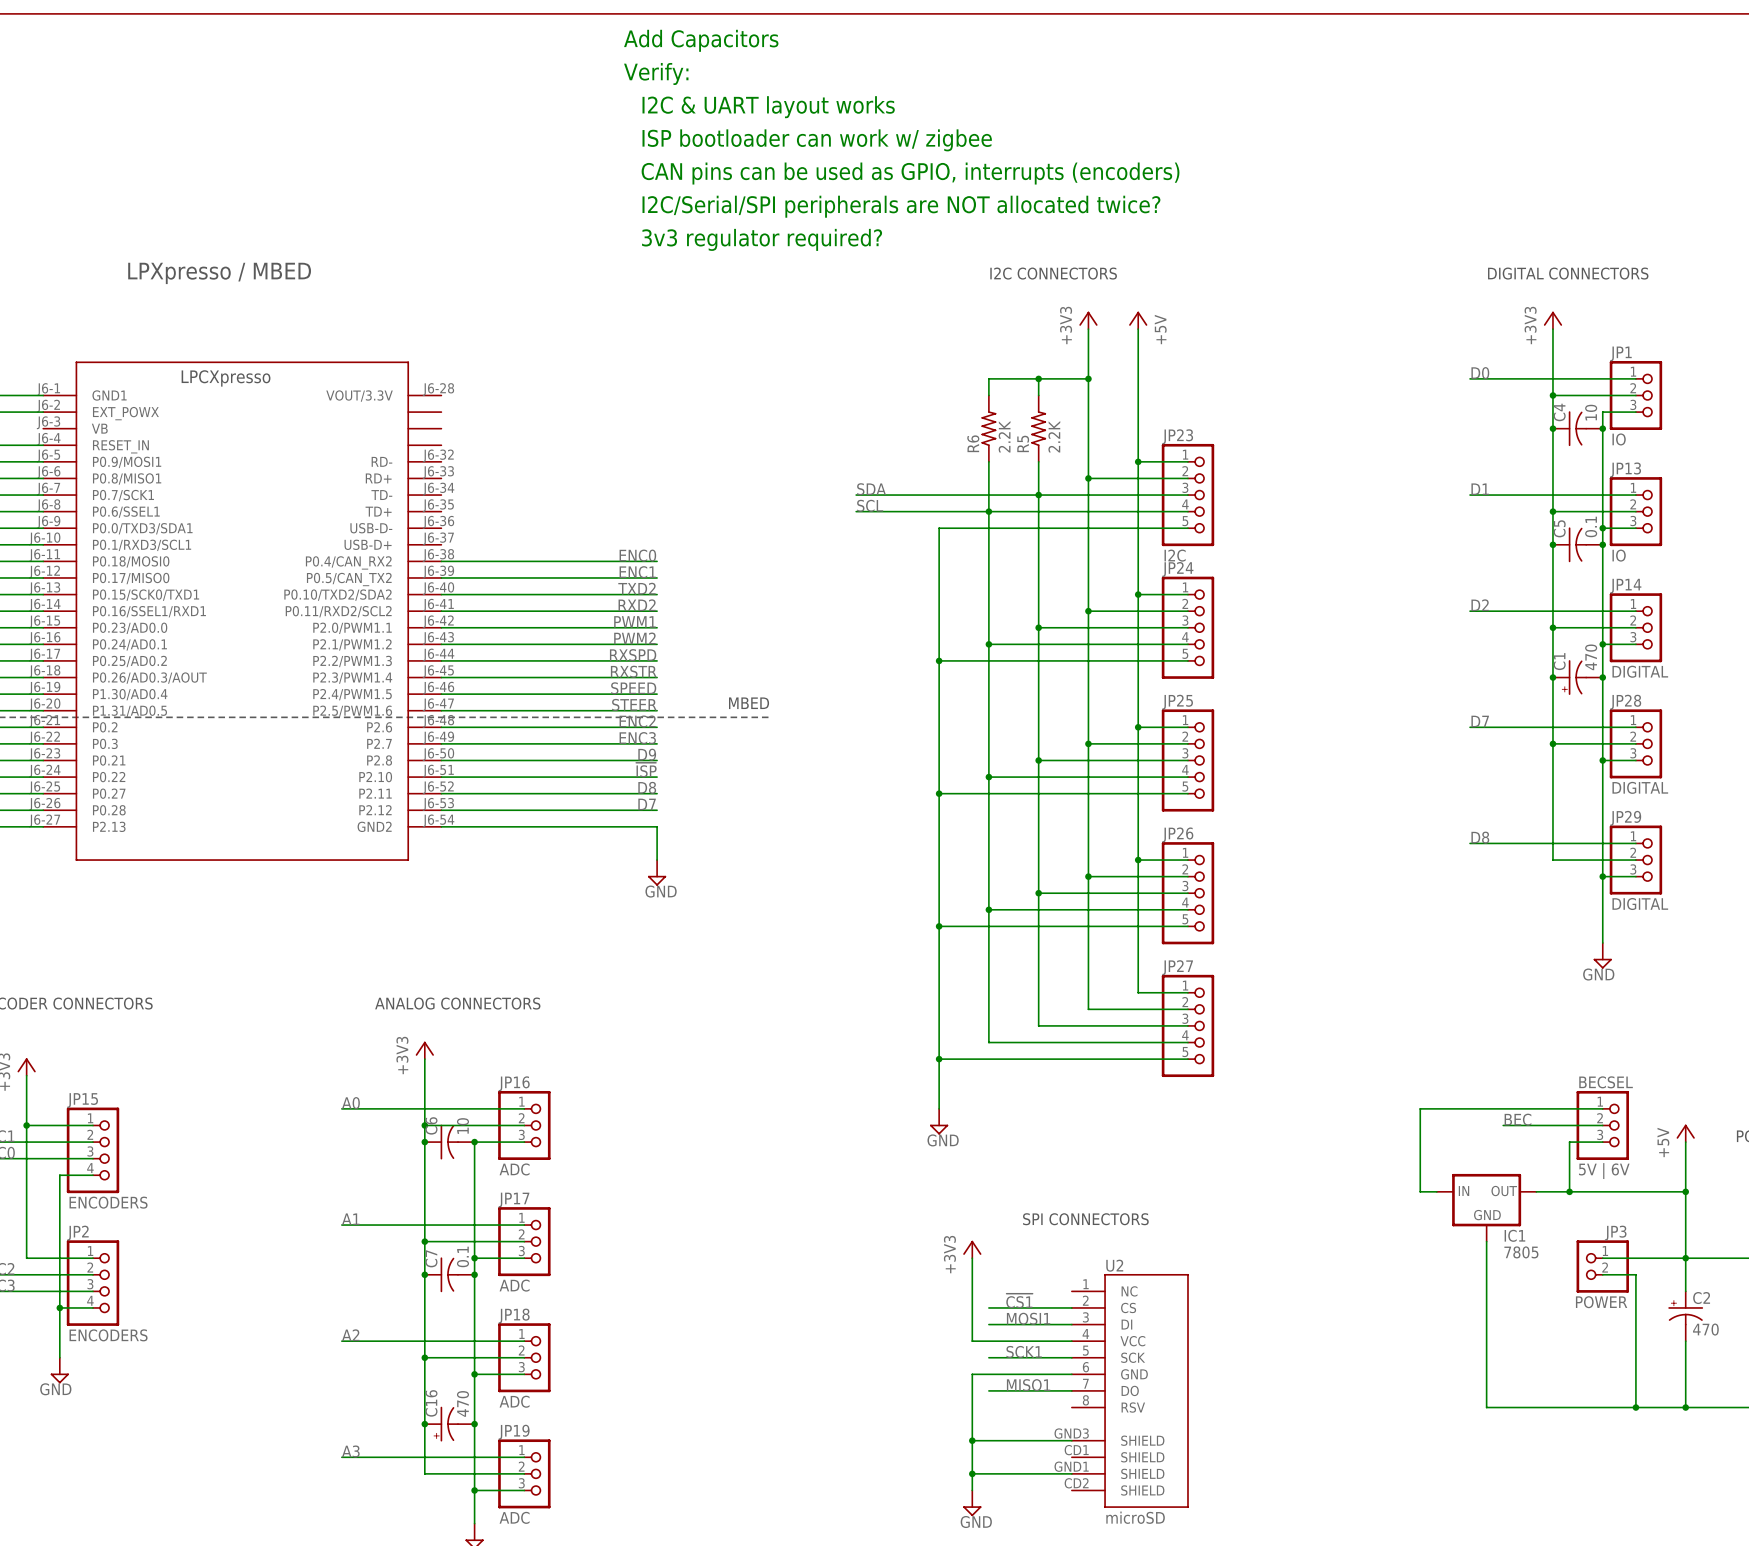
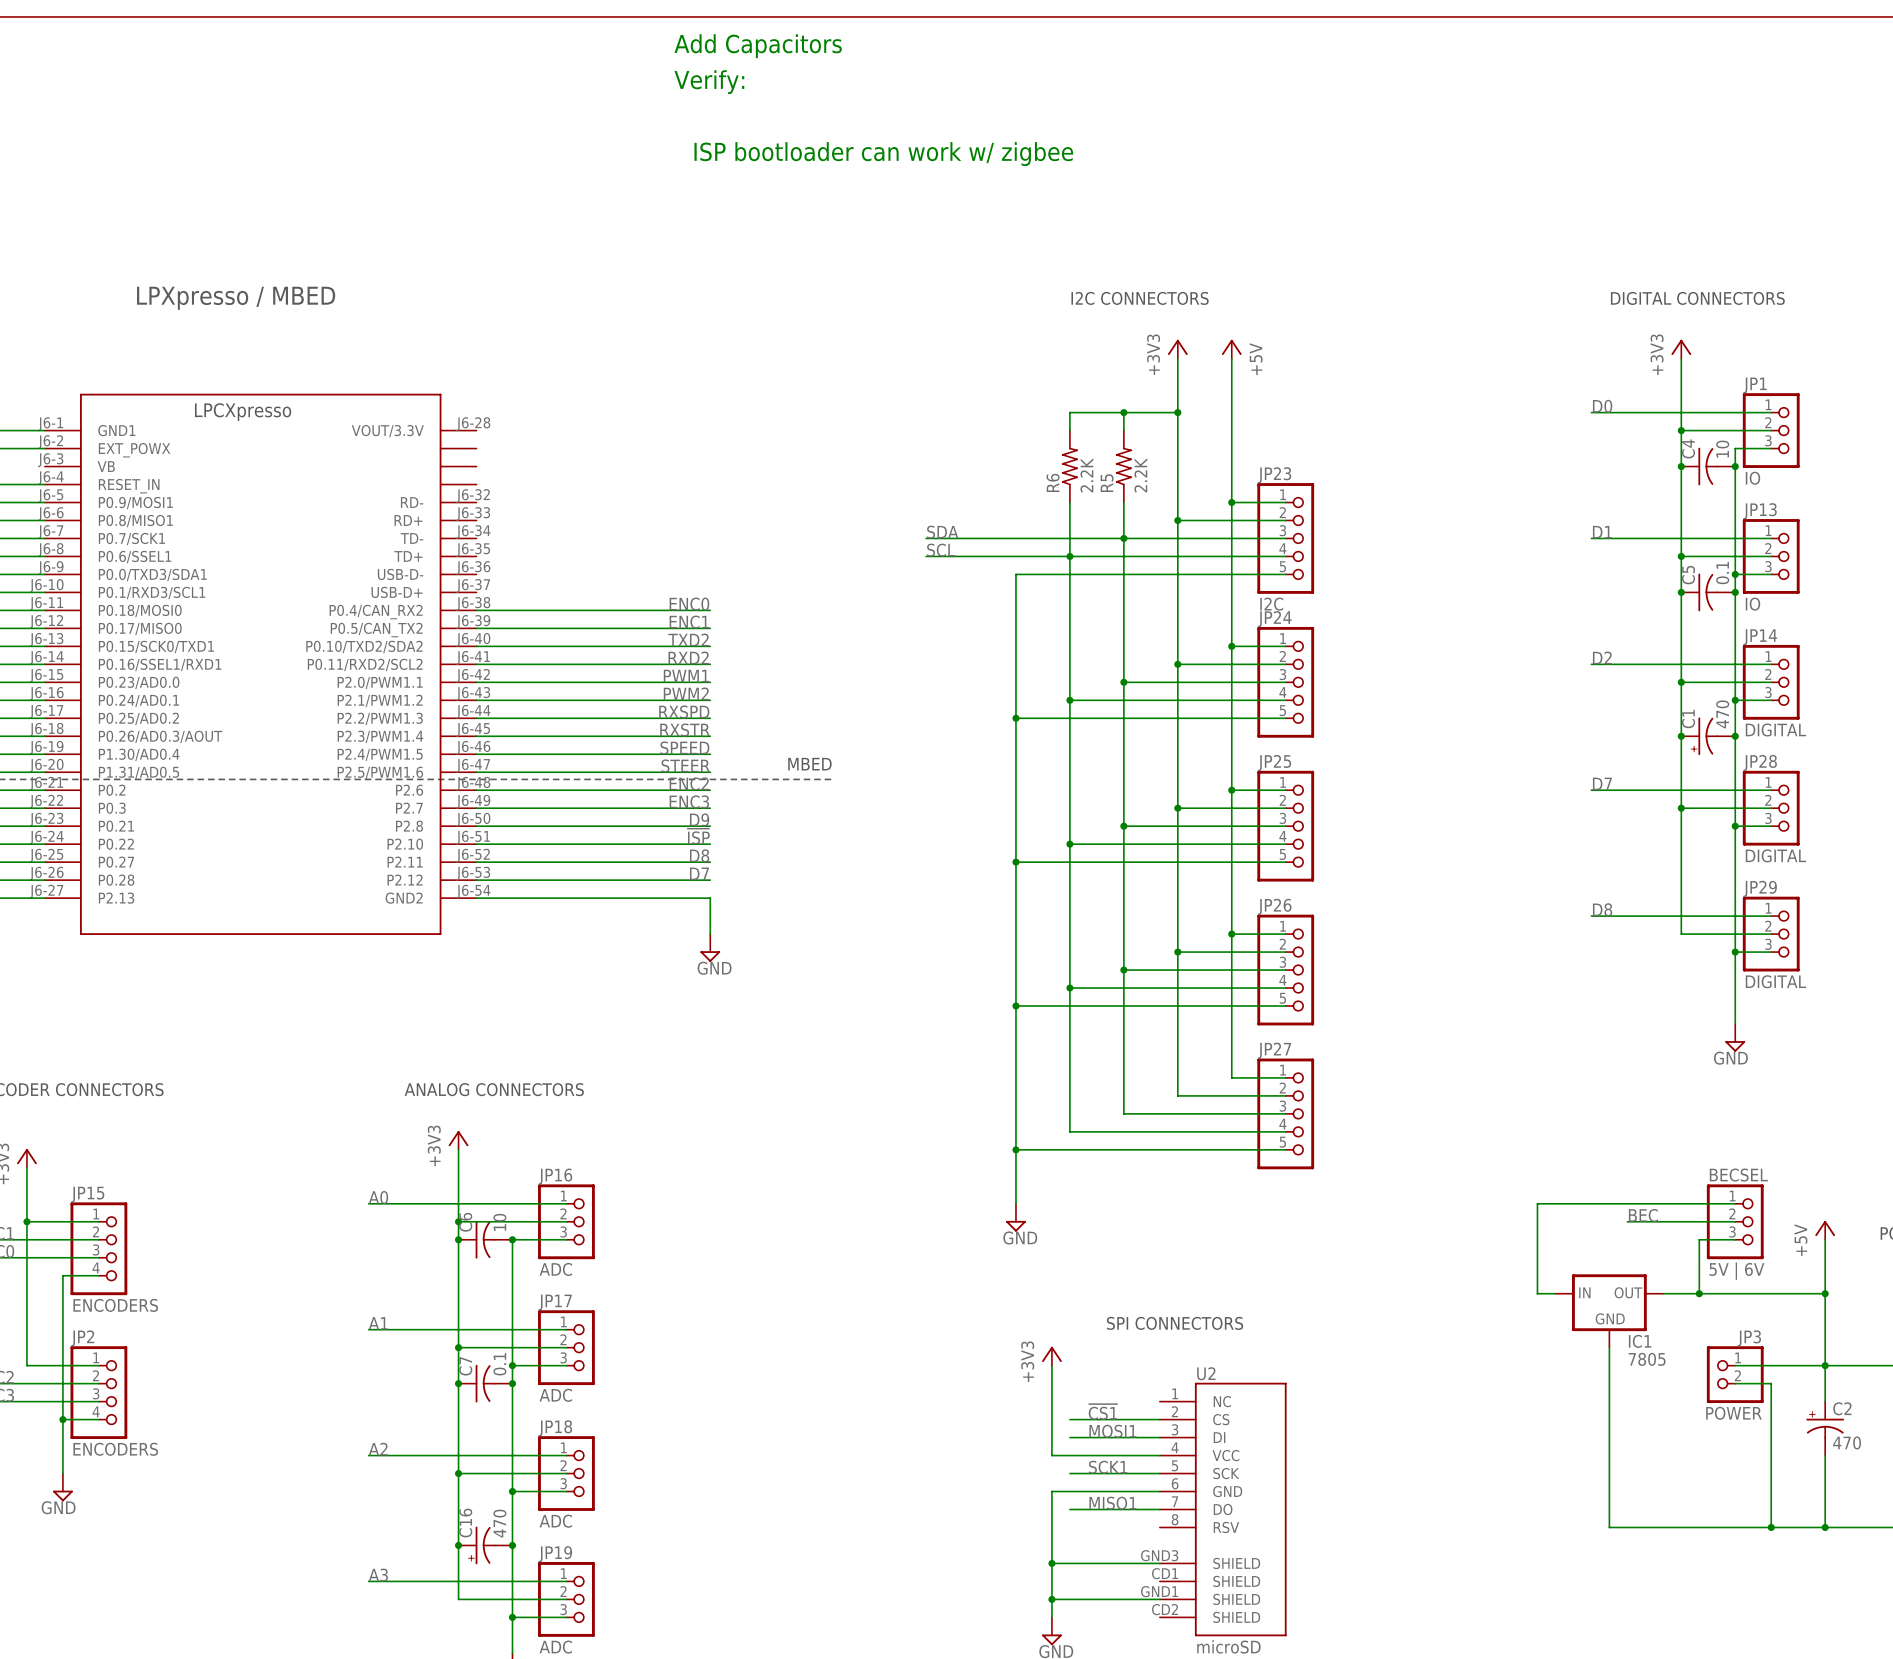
text: I2C & UART layout works (768, 107) -> none
text: CAN pins can be used as GPIO, interrupts (encoders) (910, 173) -> none
text: I2C/Serial/SPI peripherals are NOT allocated twice? (901, 206) -> none
text: 3v3 regulator required? (762, 239) -> none

